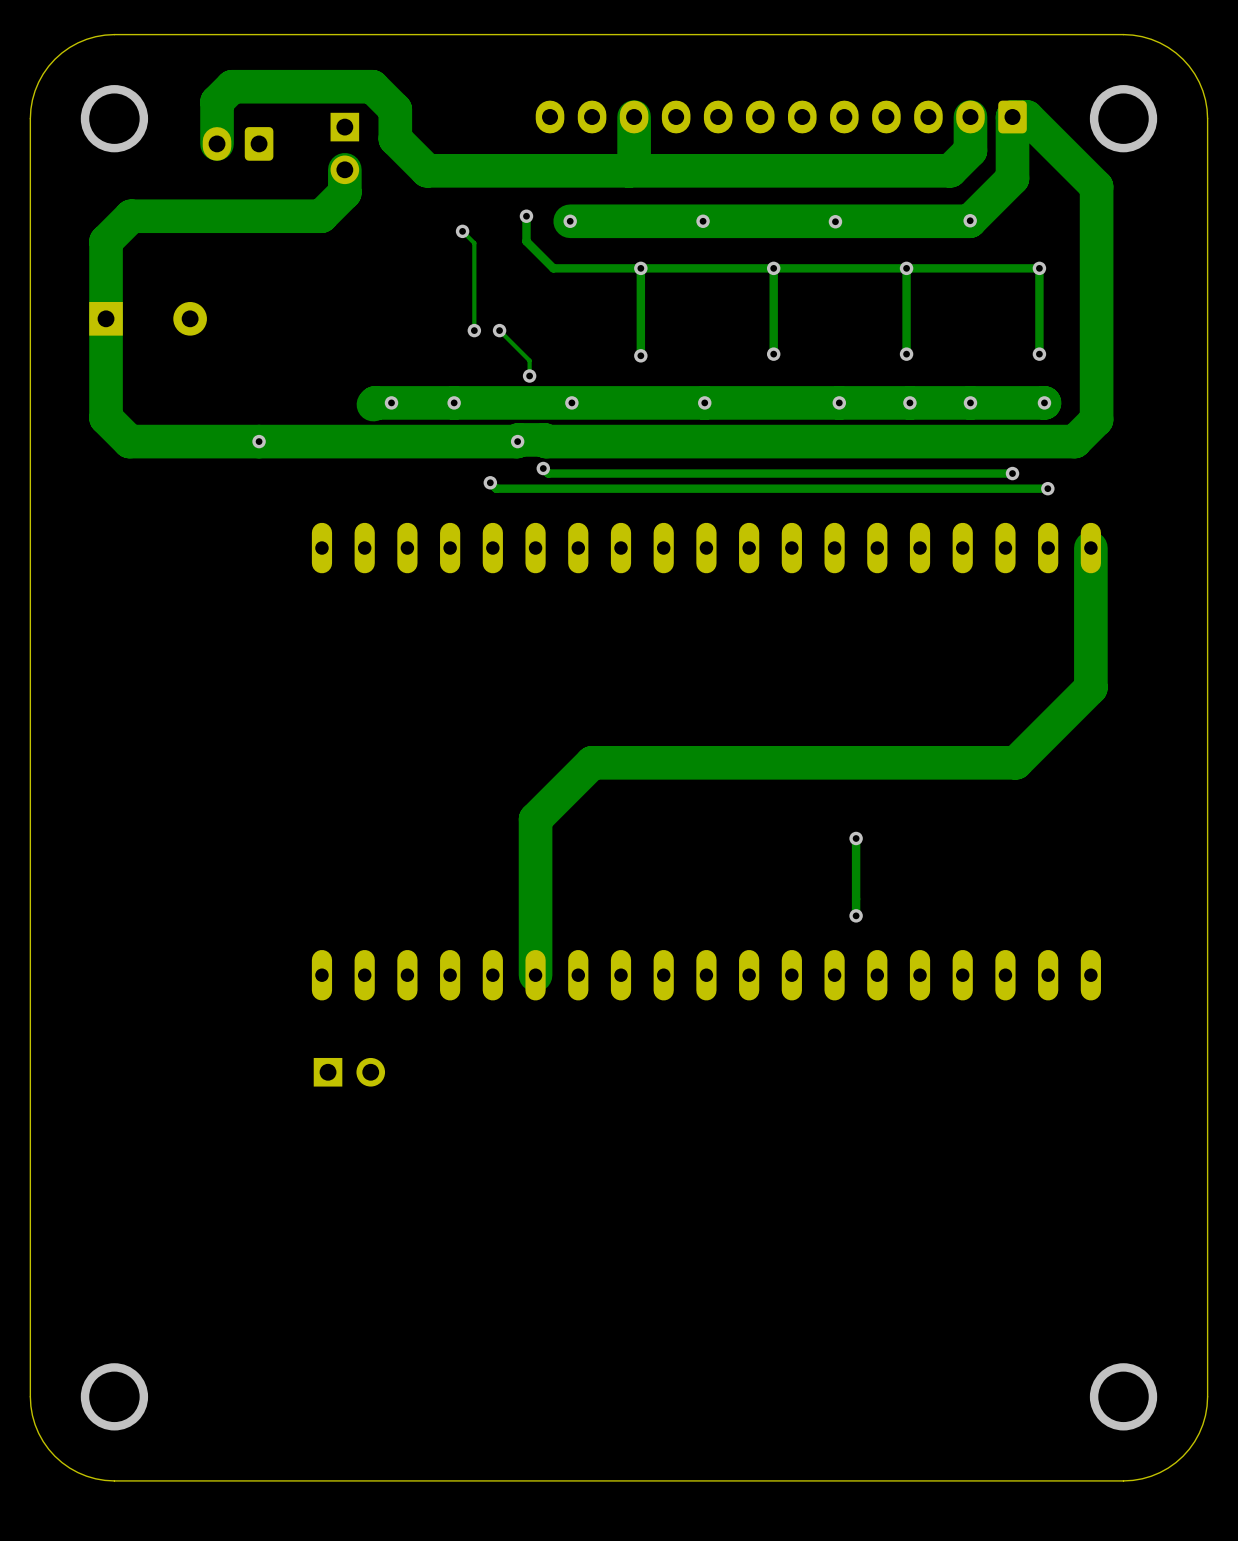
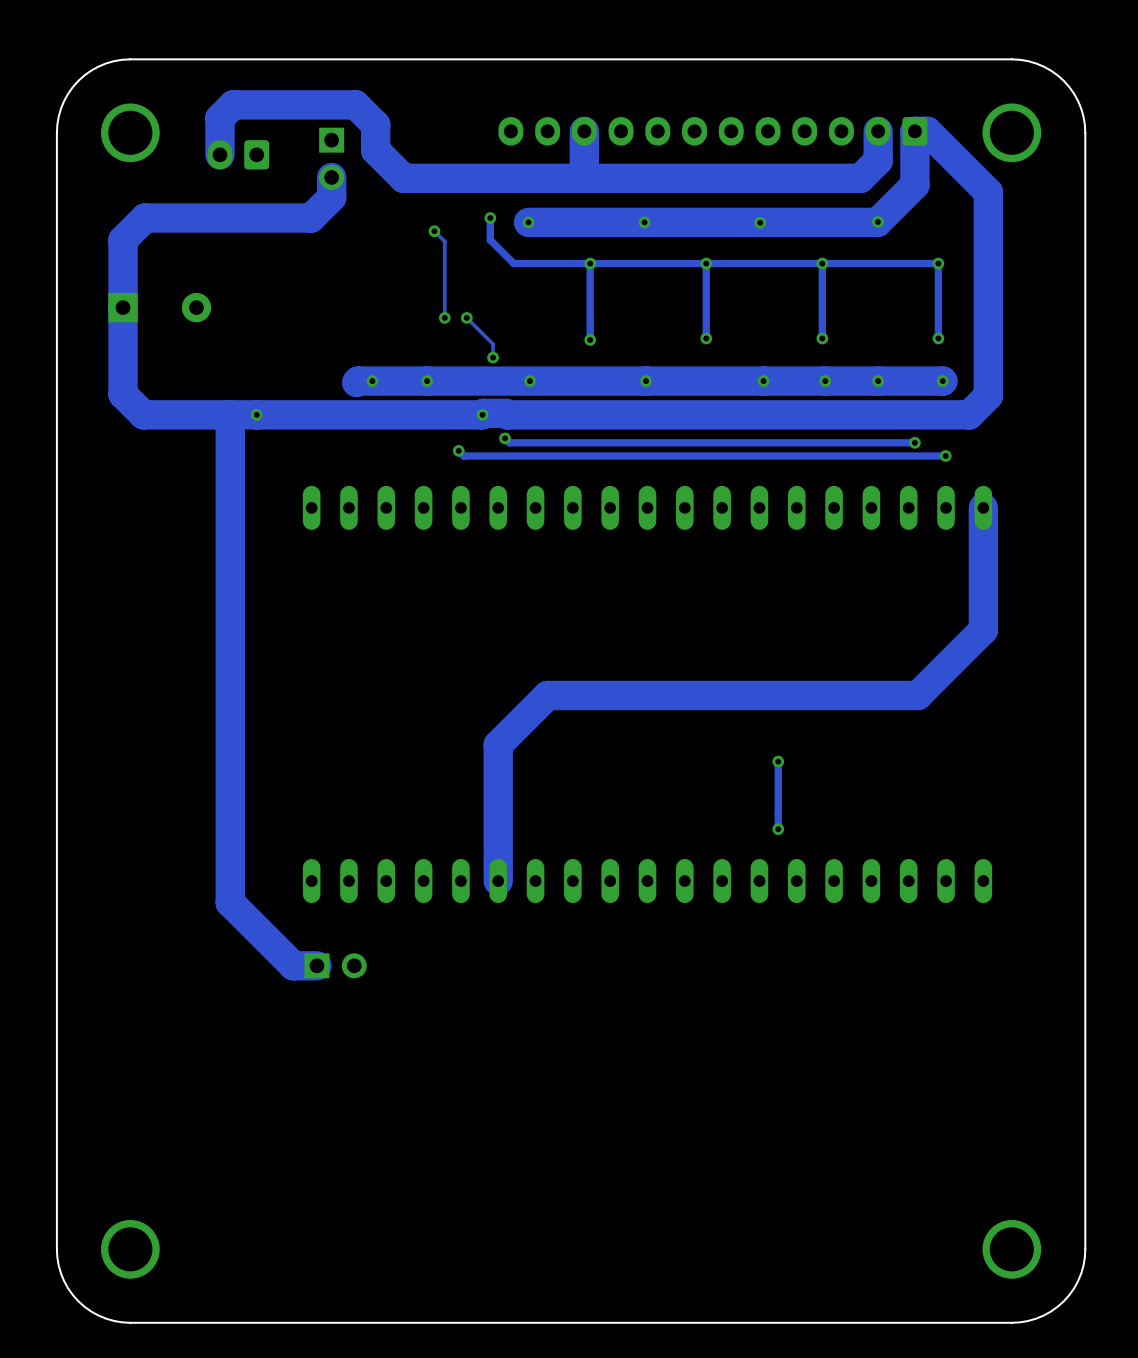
track: none -> (230, 414) (230, 902) (293, 965) (316, 965)

